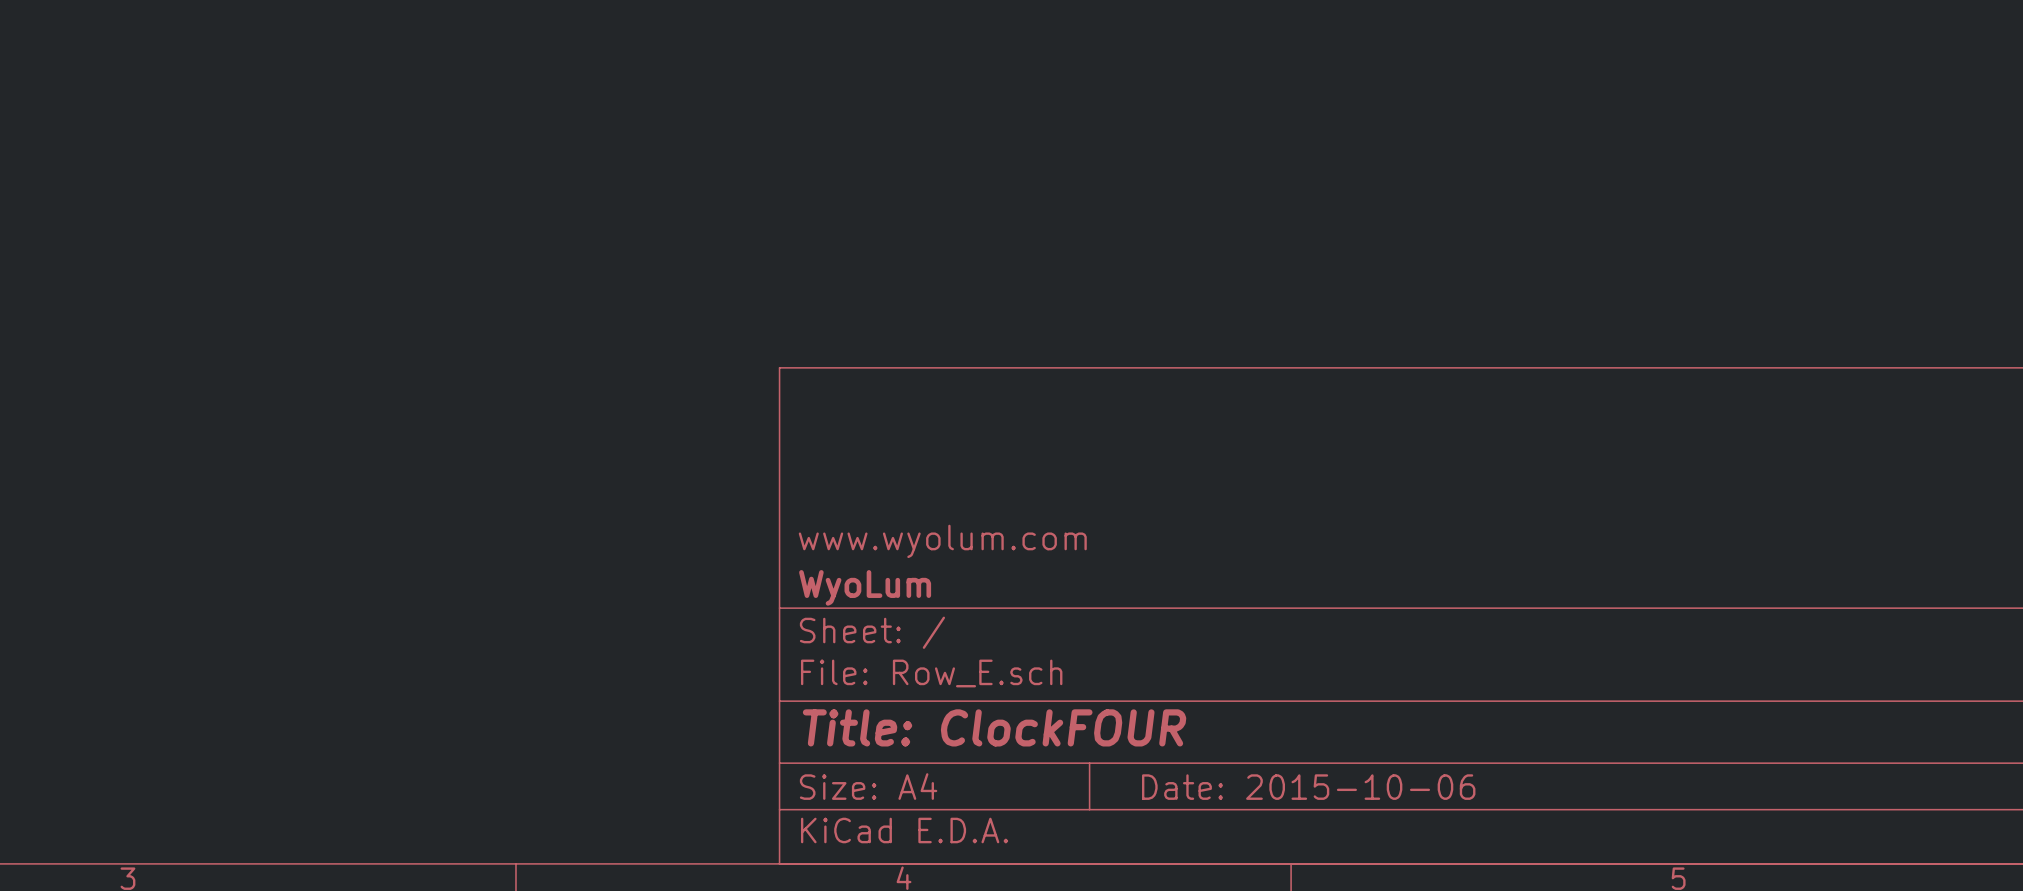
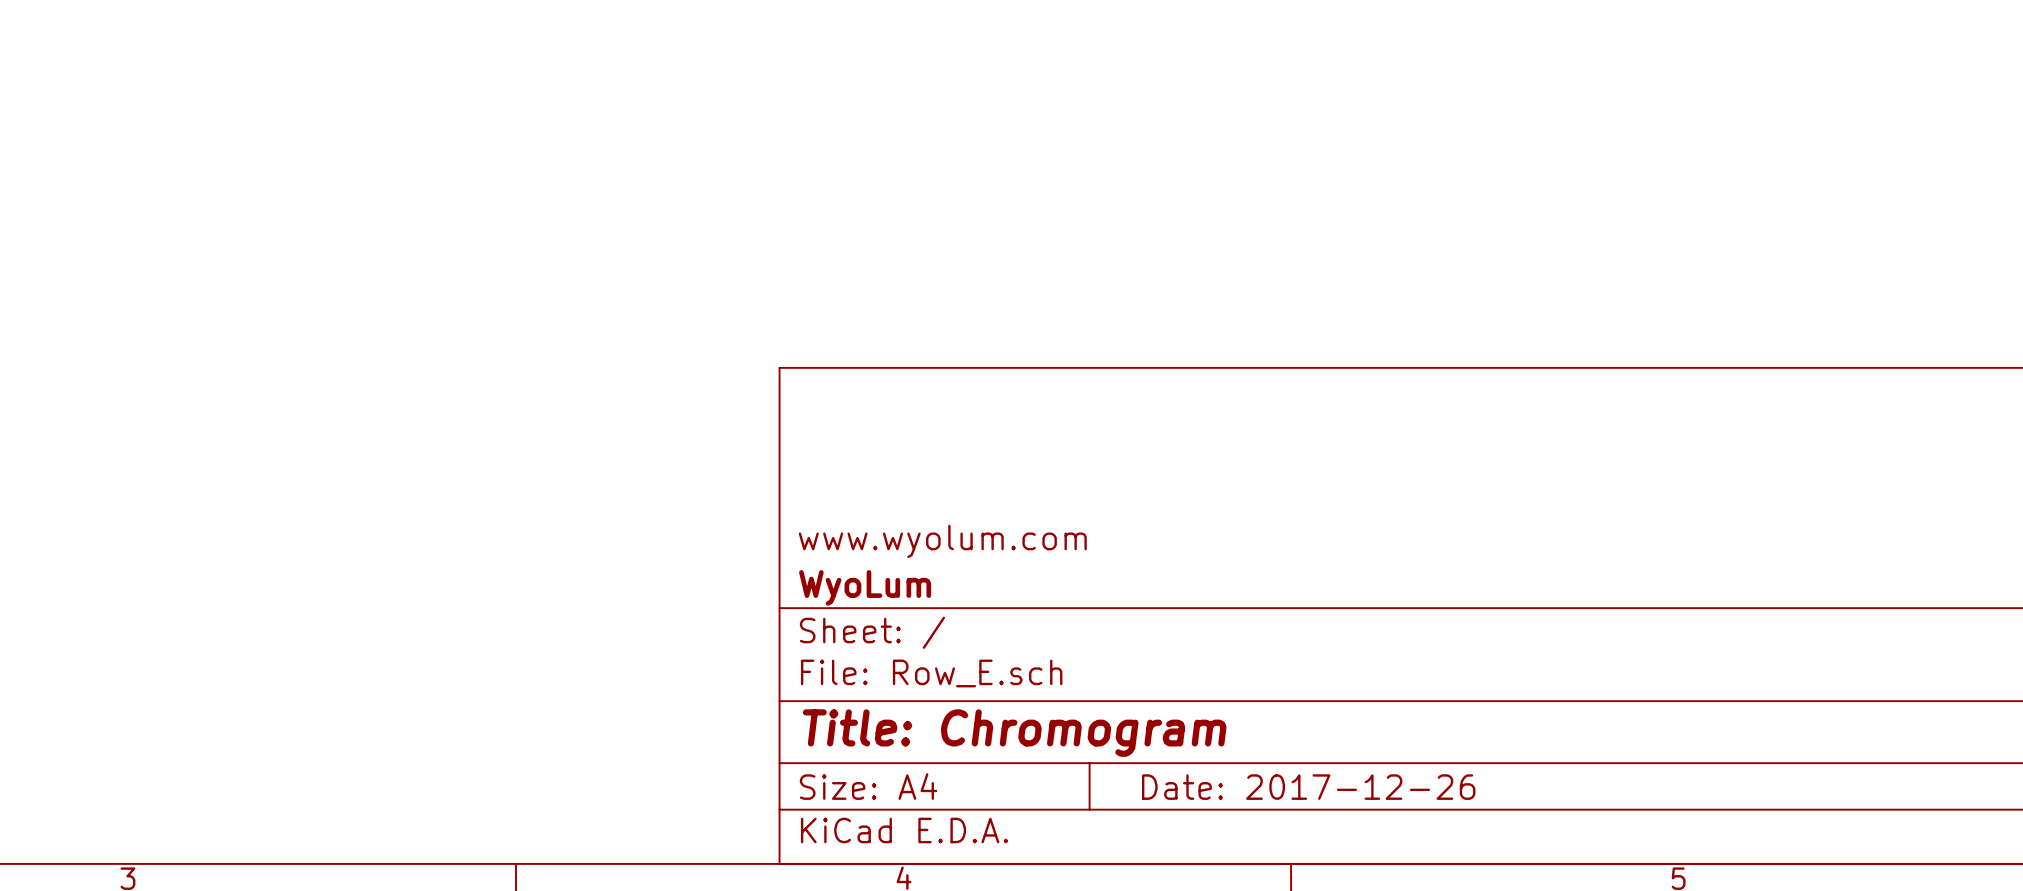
title block: Title: ClockFOUR (994, 727) -> Title: Chromogram (1014, 733)
title block: Date: 2015-10-06 (1308, 787) -> Date: 2017-12-26 (1308, 787)

